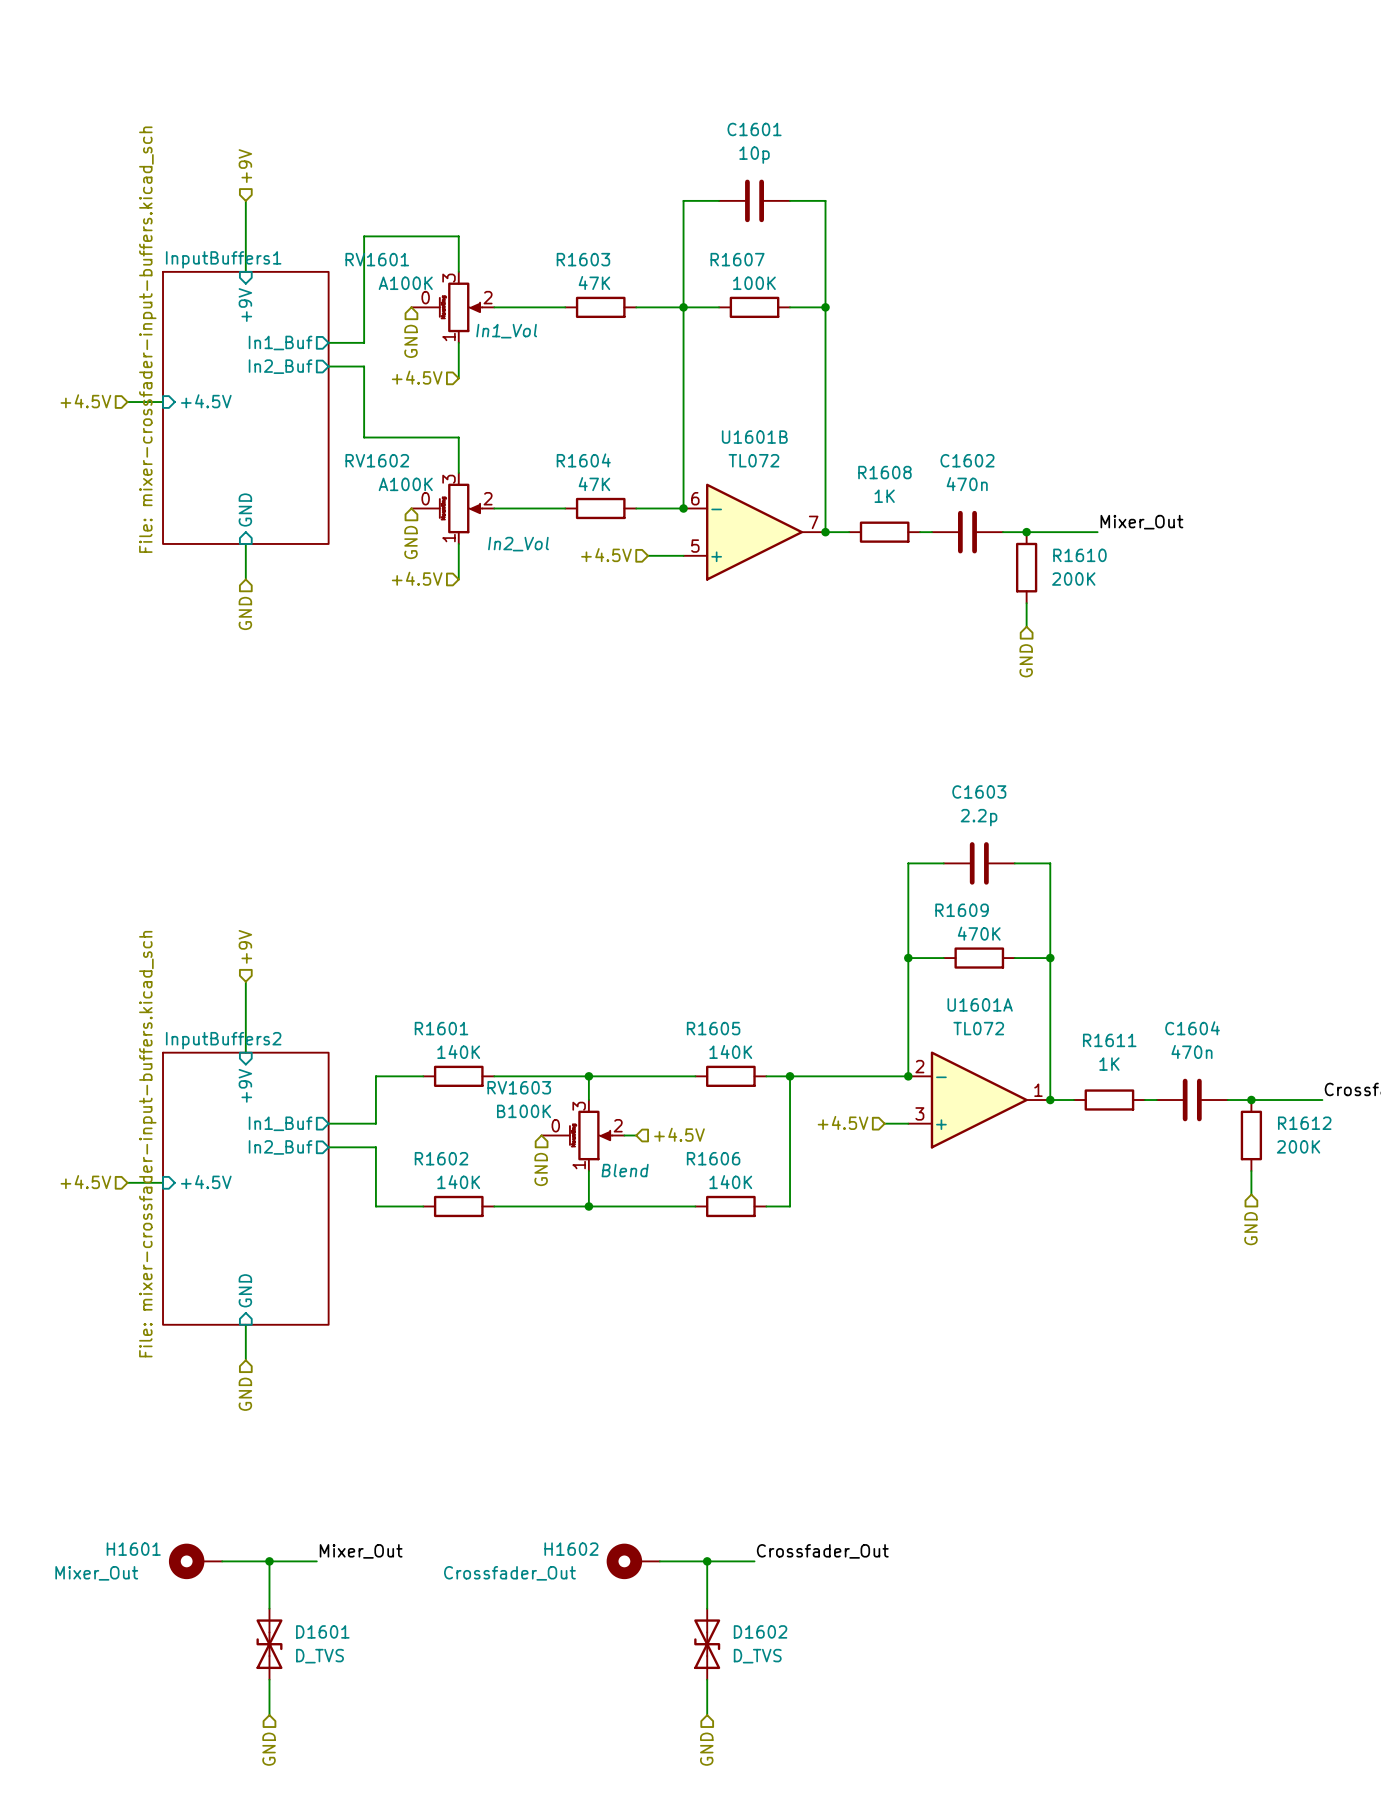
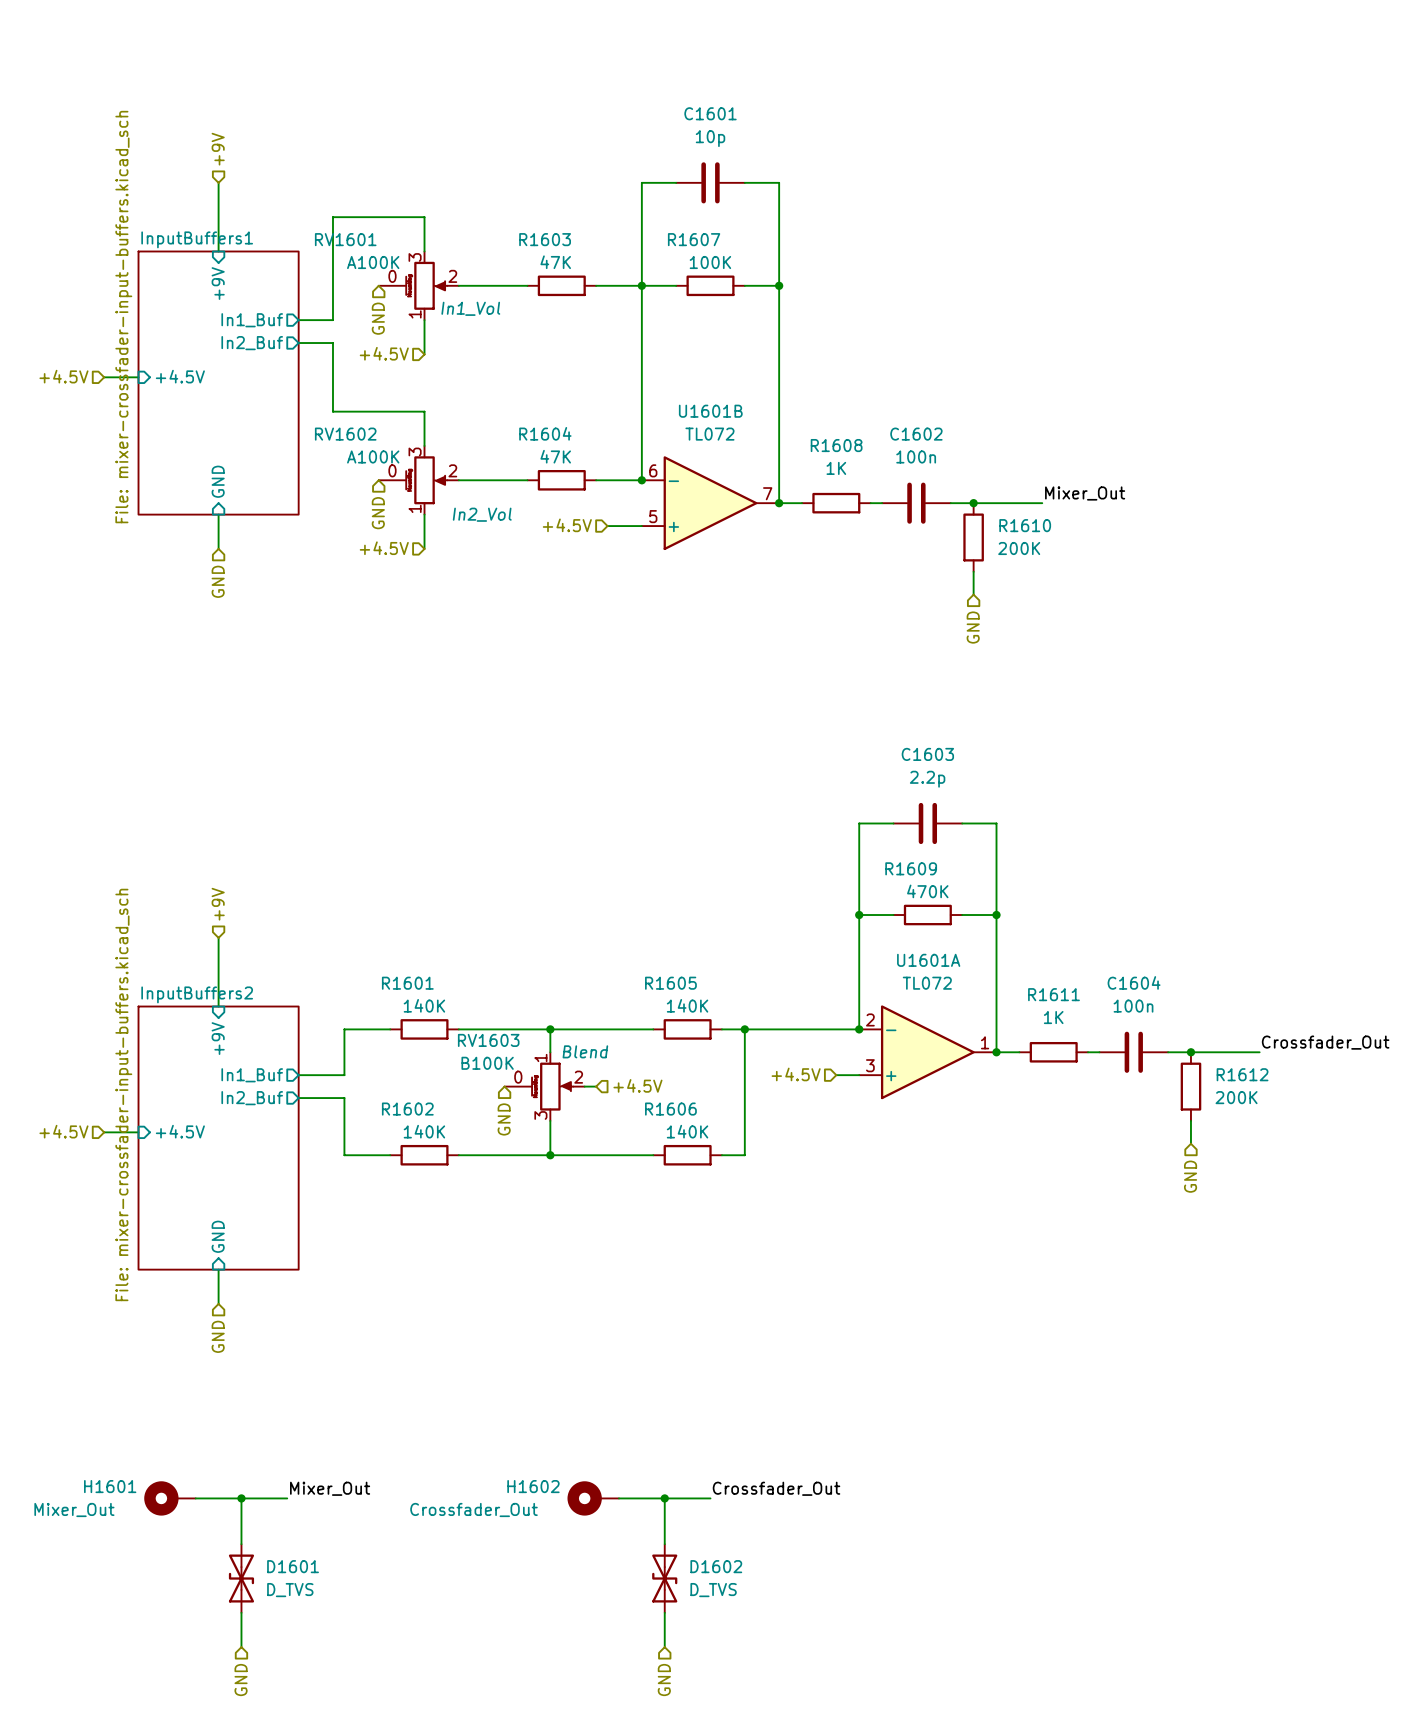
C1602 value: 470n (967, 484) -> 100n (916, 456)
C1604 value: 470n (1191, 1051) -> 100n (1133, 1006)
RV1603 flip: as is (590, 1135) -> up-down (552, 1086)

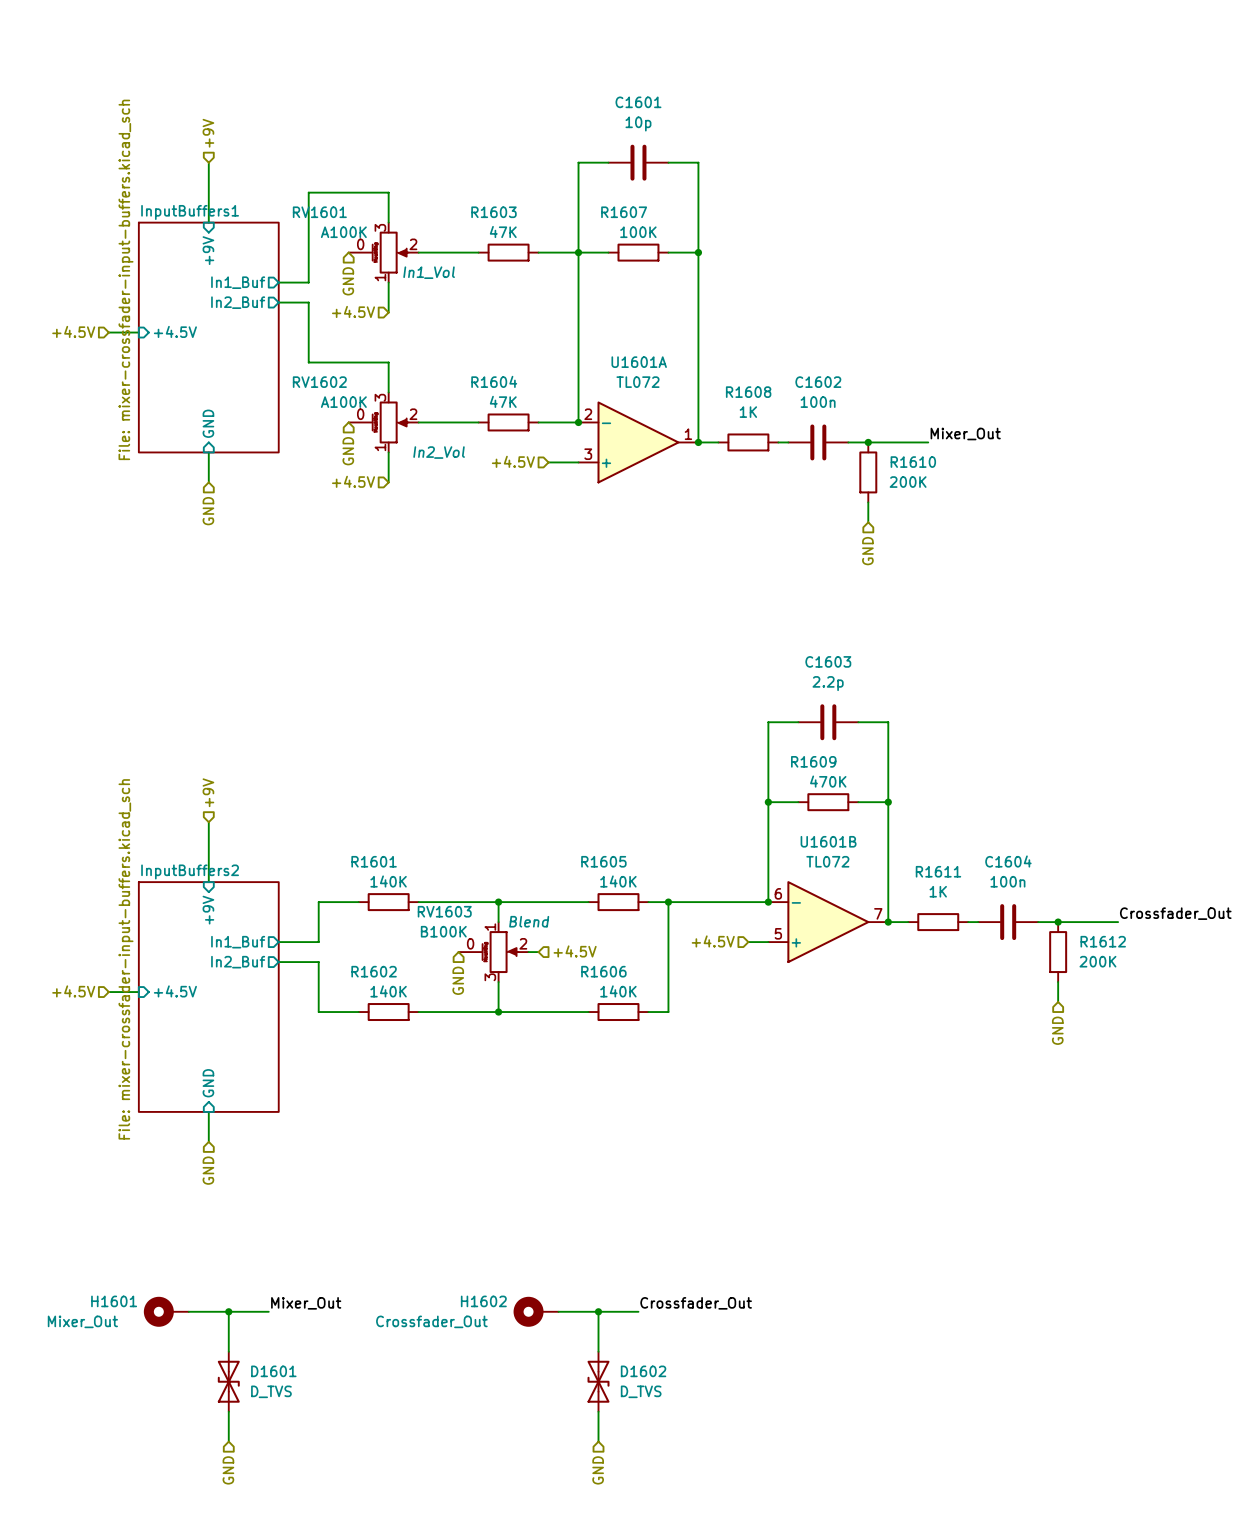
U1601B position: (710, 503) -> (828, 922)
U1601A position: (927, 1052) -> (638, 442)

